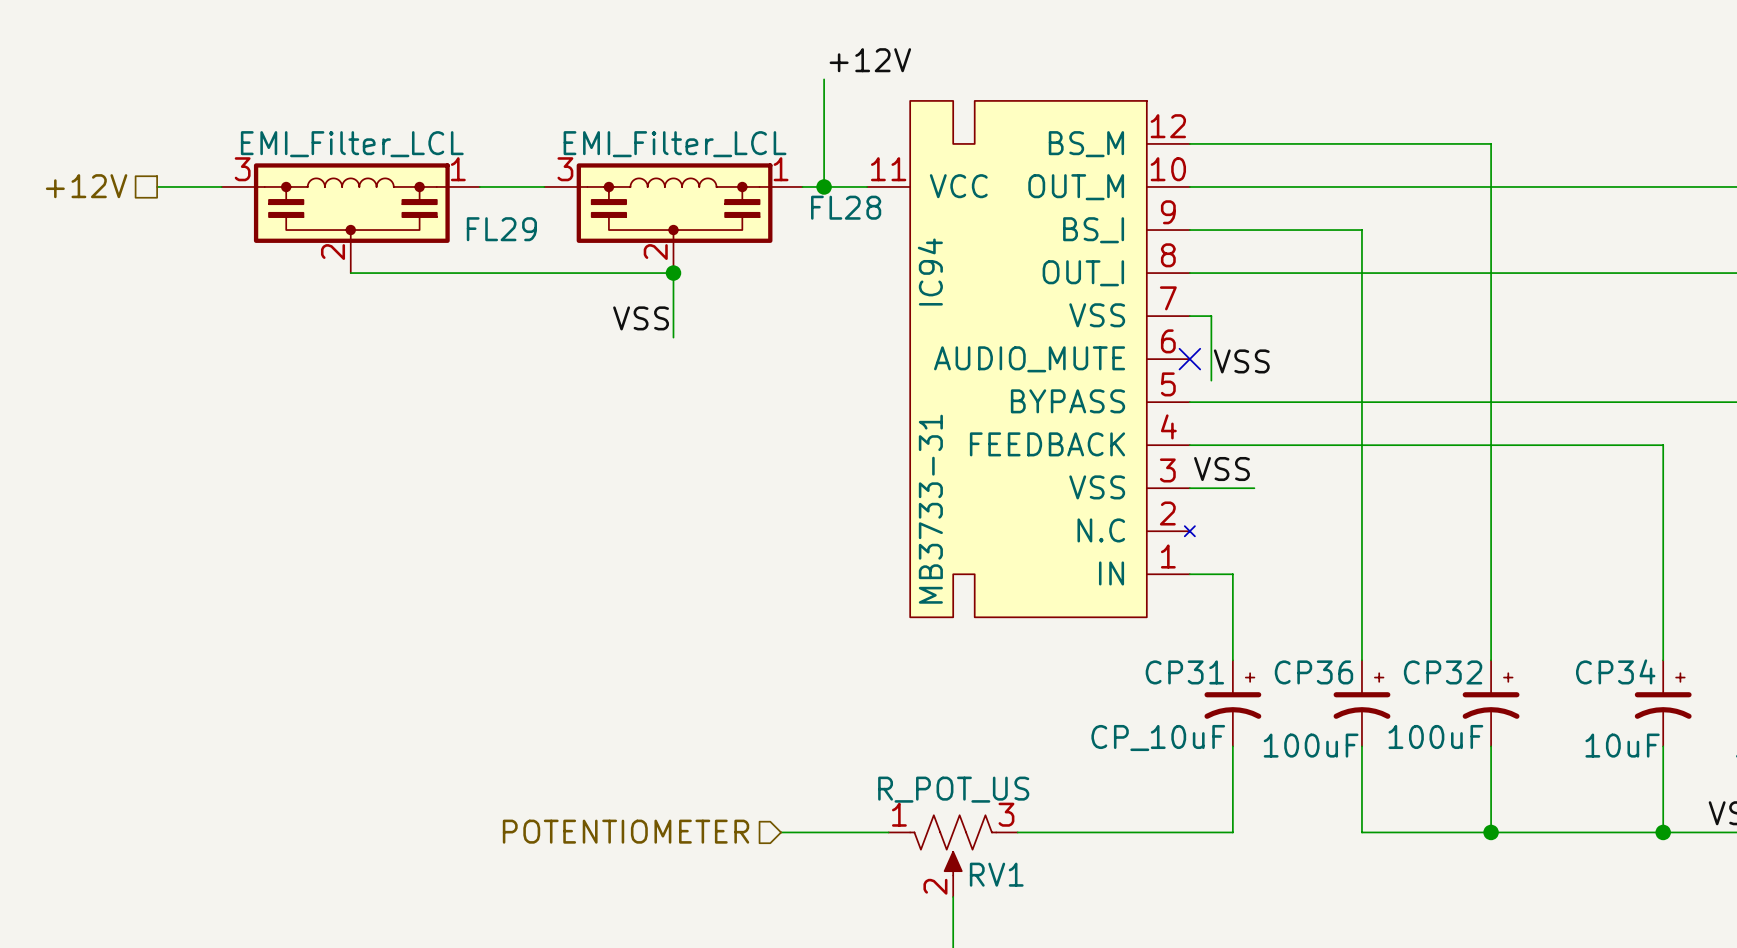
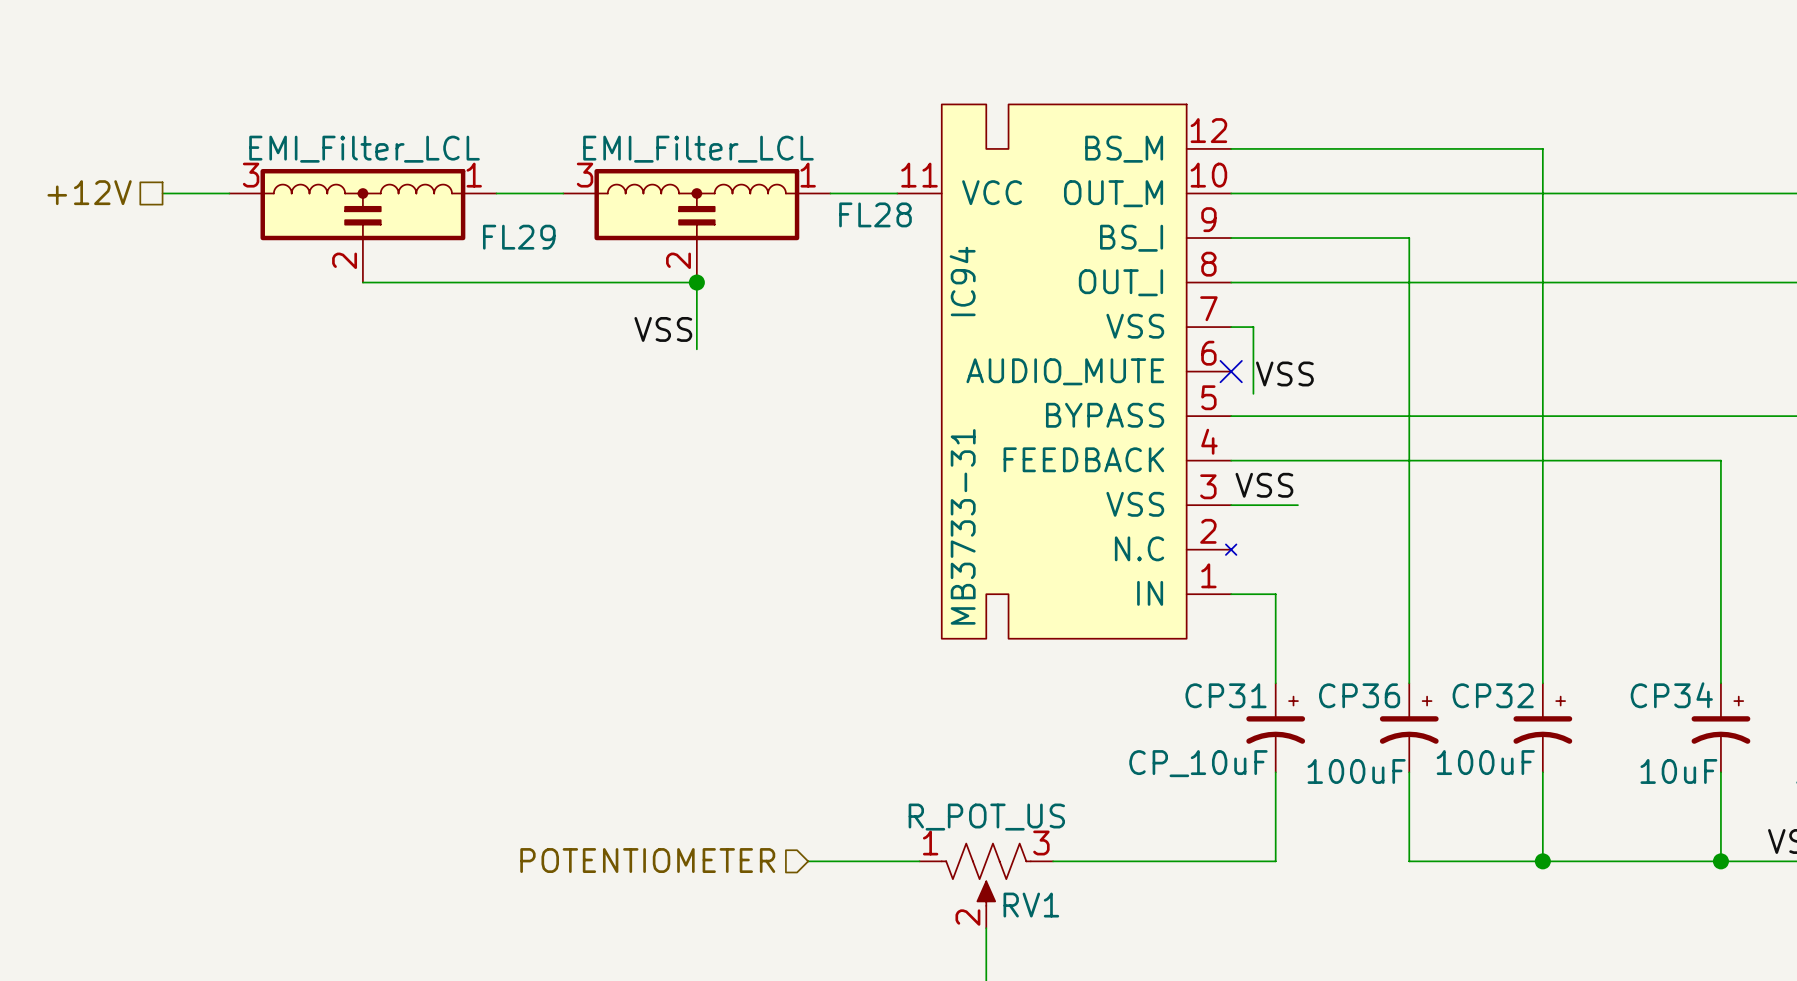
label: +12V (870, 60) -> none
wire: (824, 79) (824, 186) -> none
FL29 symbol: [221, 163, 480, 274] -> [229, 168, 497, 283]
FL28 symbol: [544, 163, 803, 274] -> [563, 168, 831, 283]
junction: (824, 186) -> none

